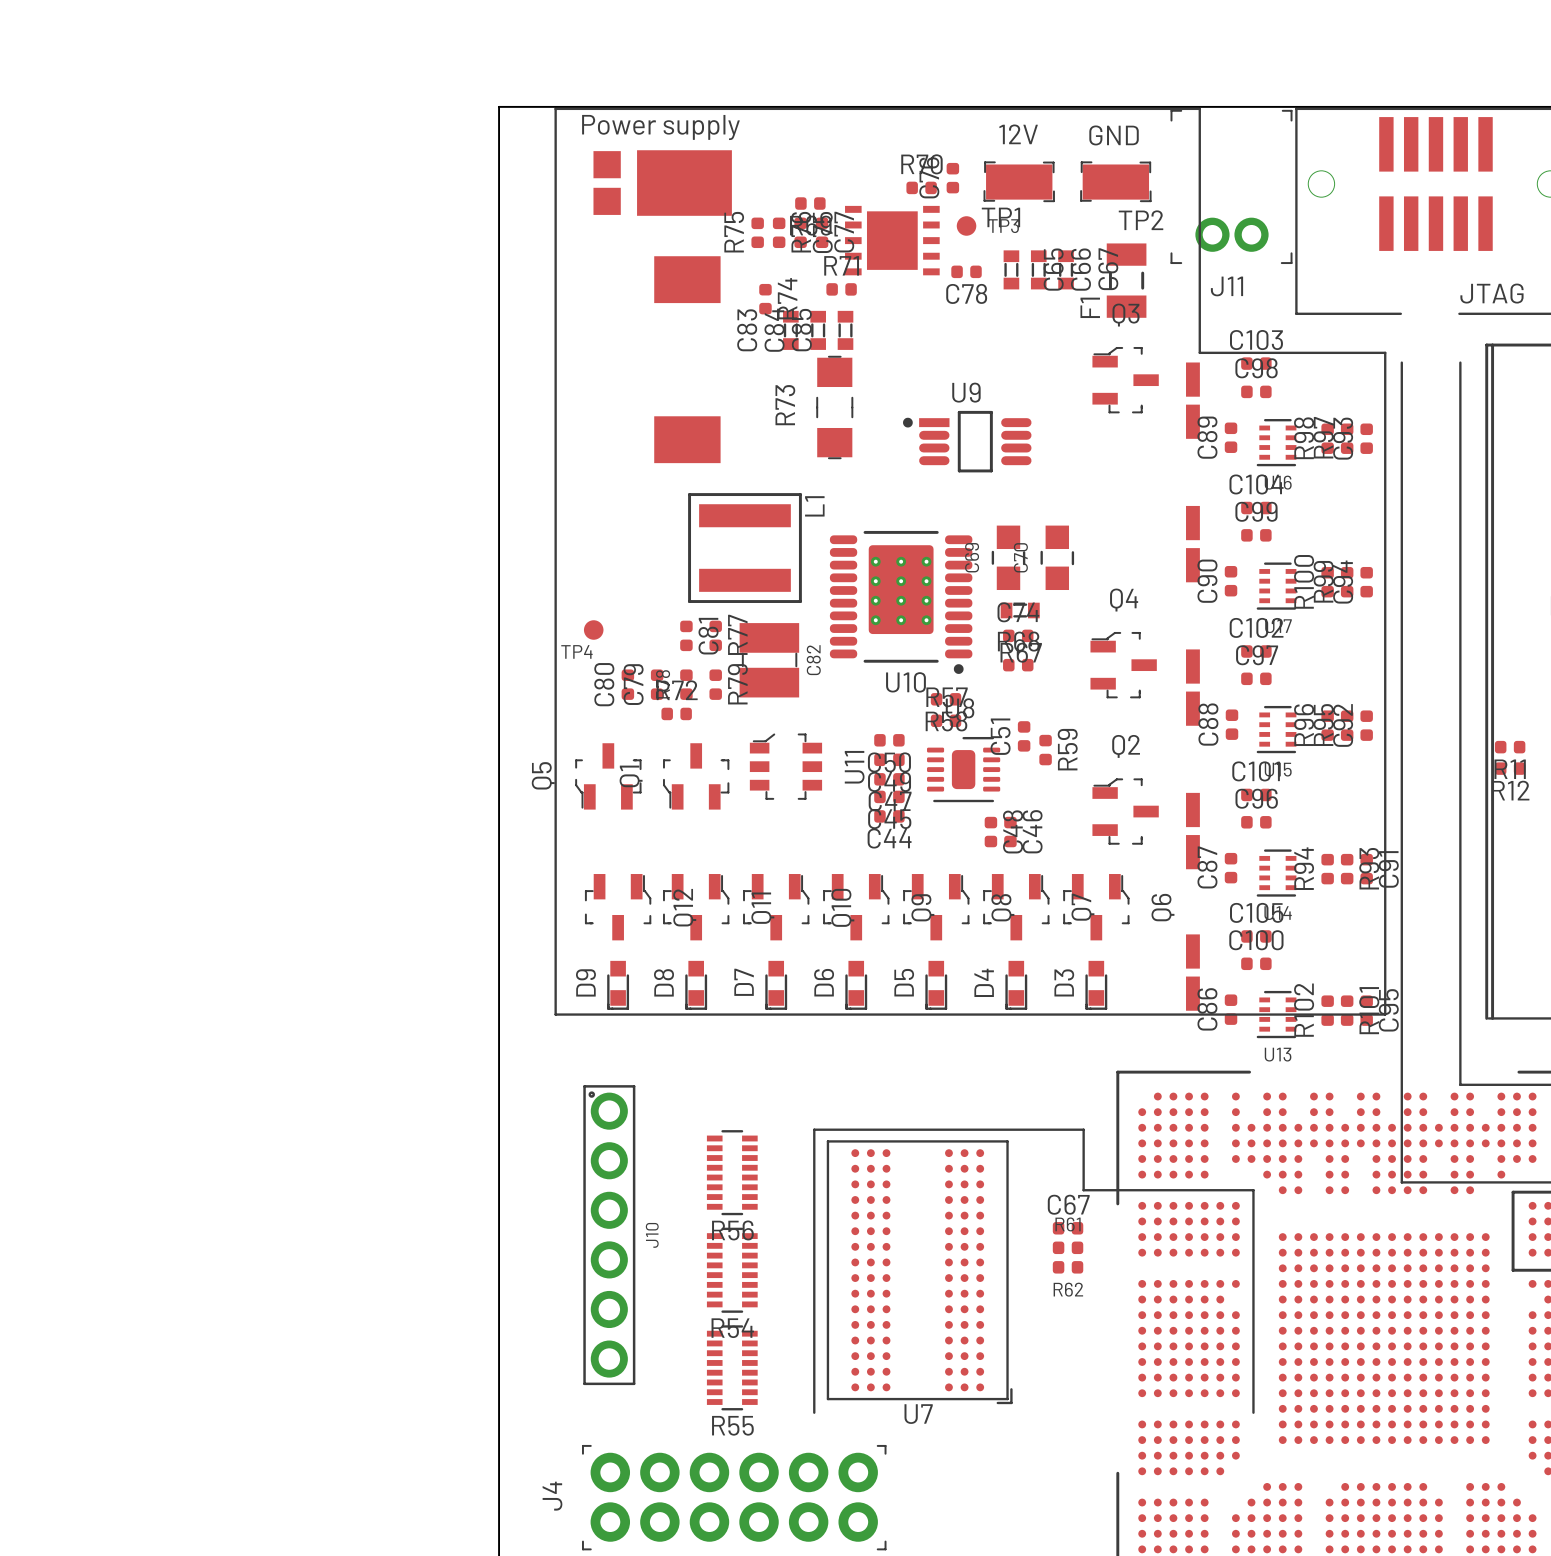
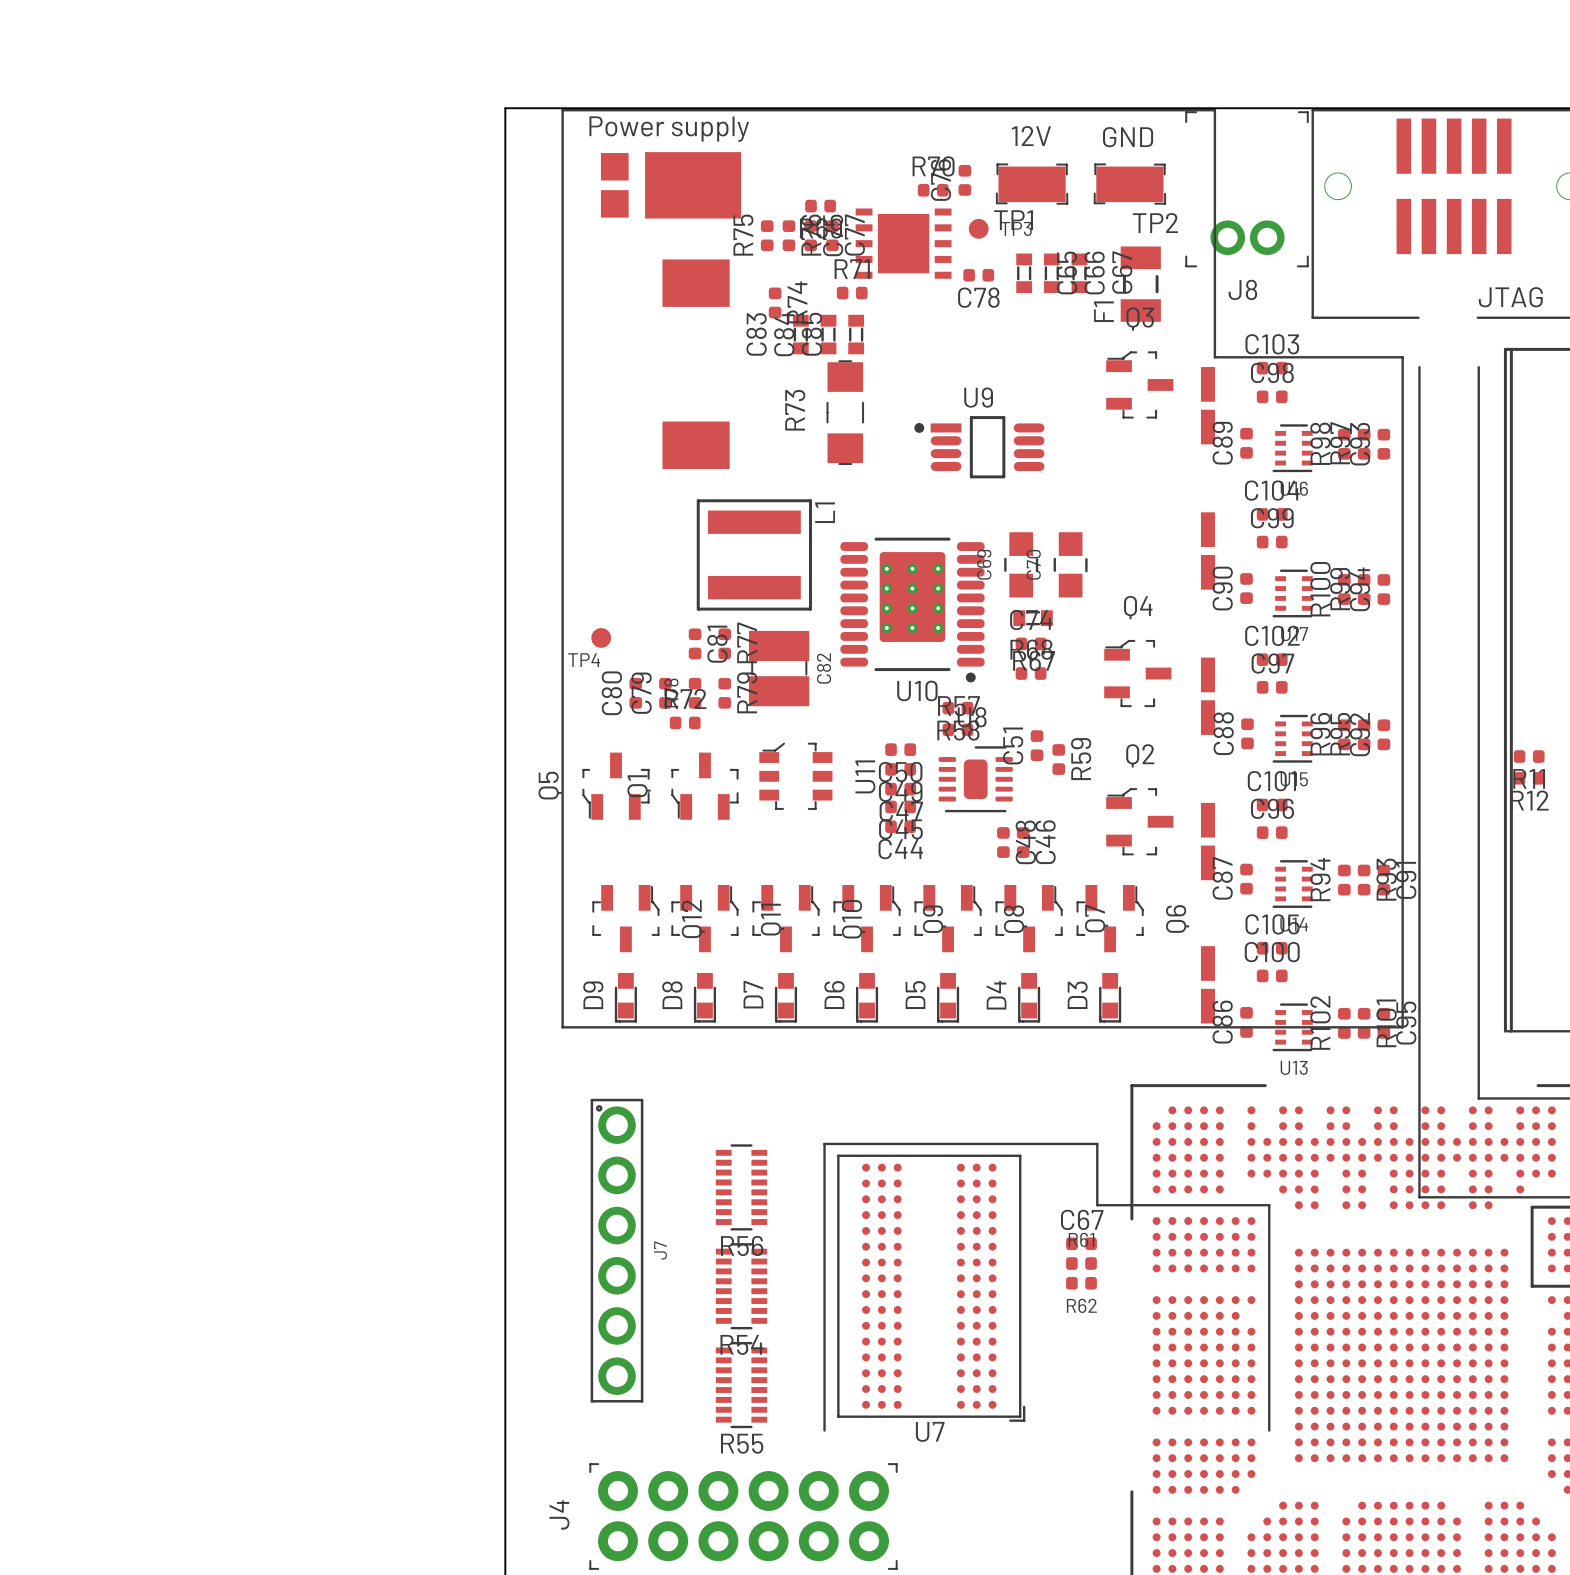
J11 name: J11 (1227, 286) -> J8 (1242, 289)
J10 name: J10 (652, 1235) -> J7 (660, 1250)

